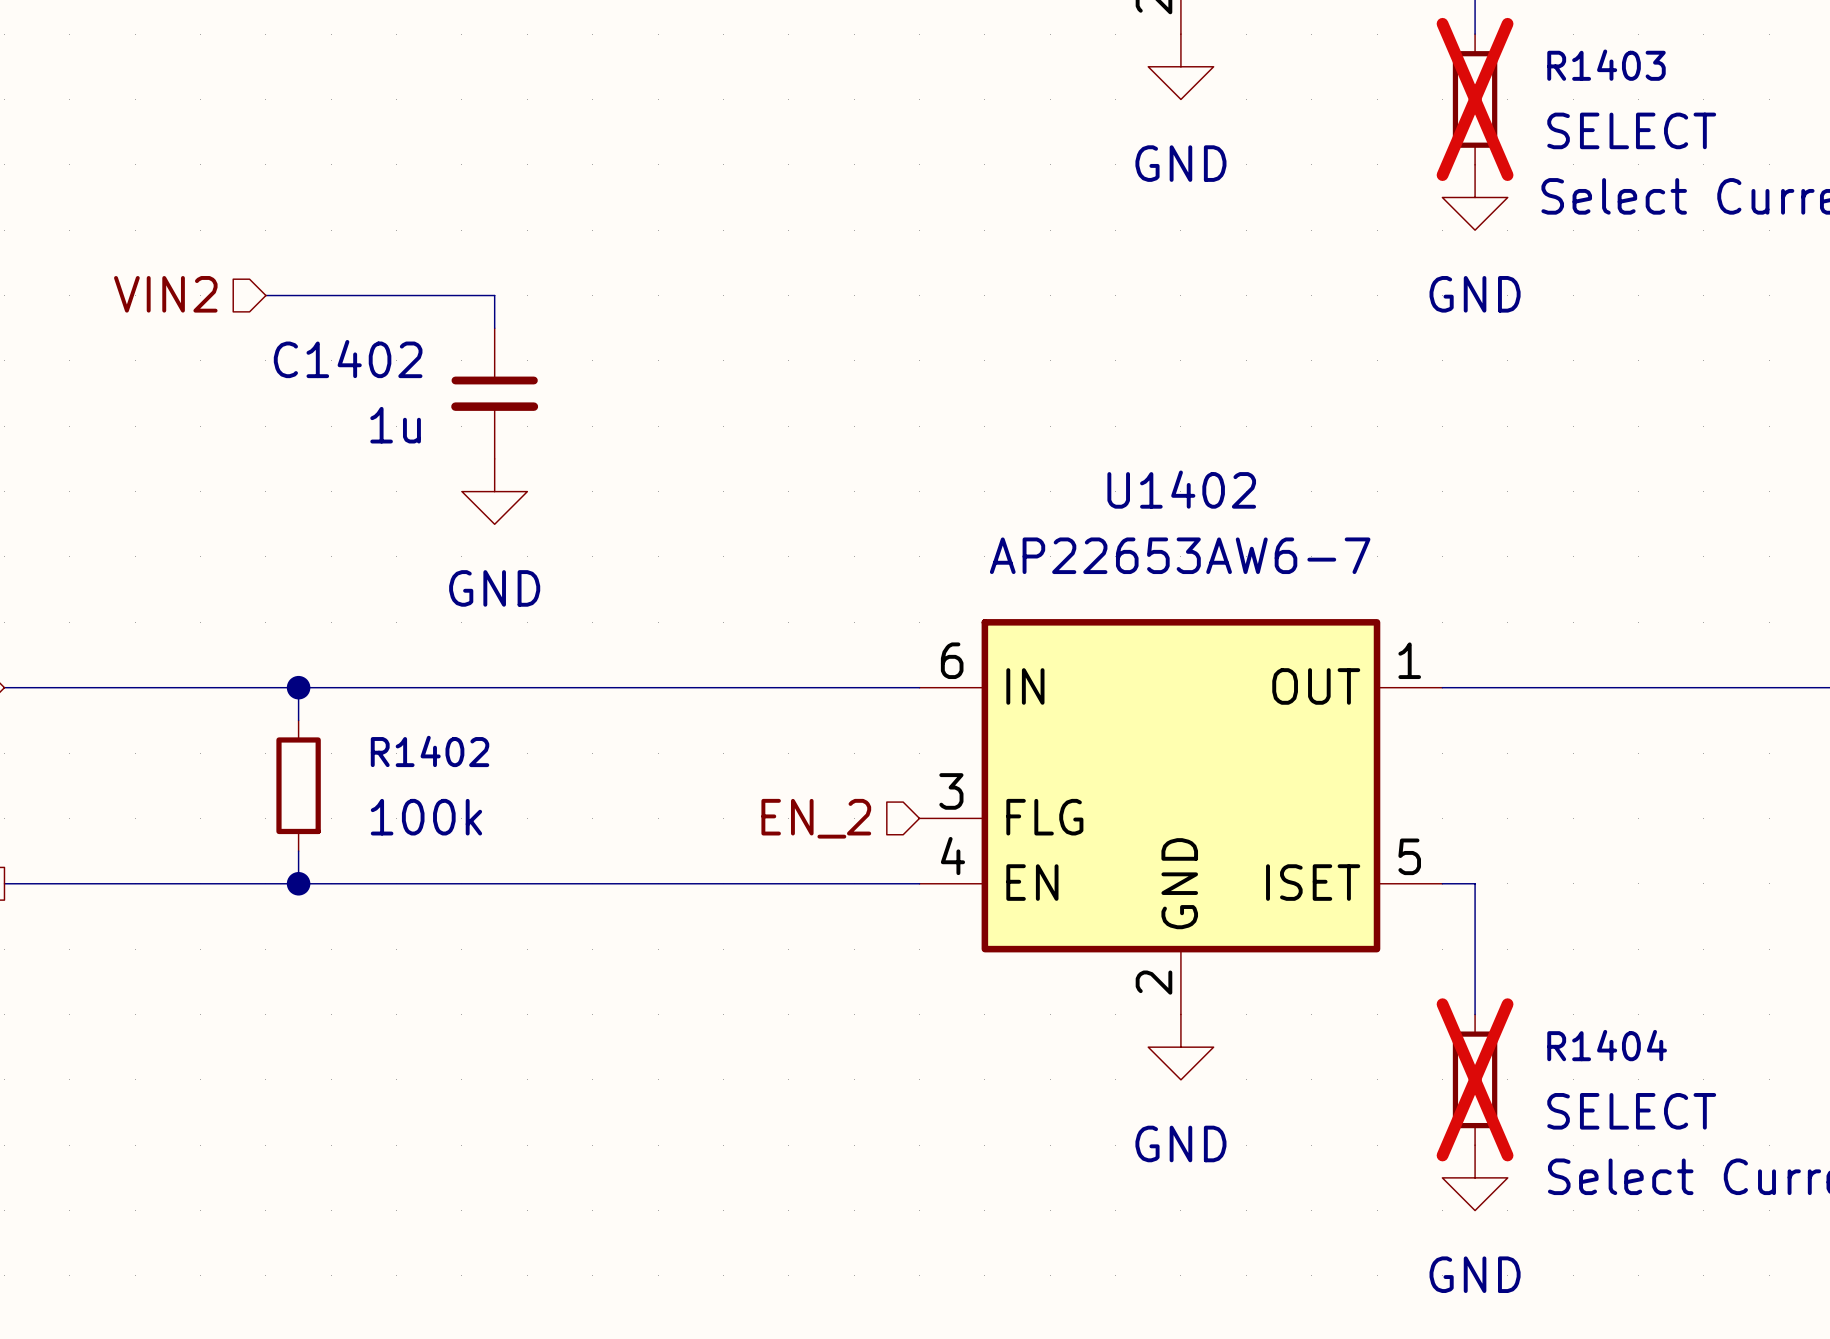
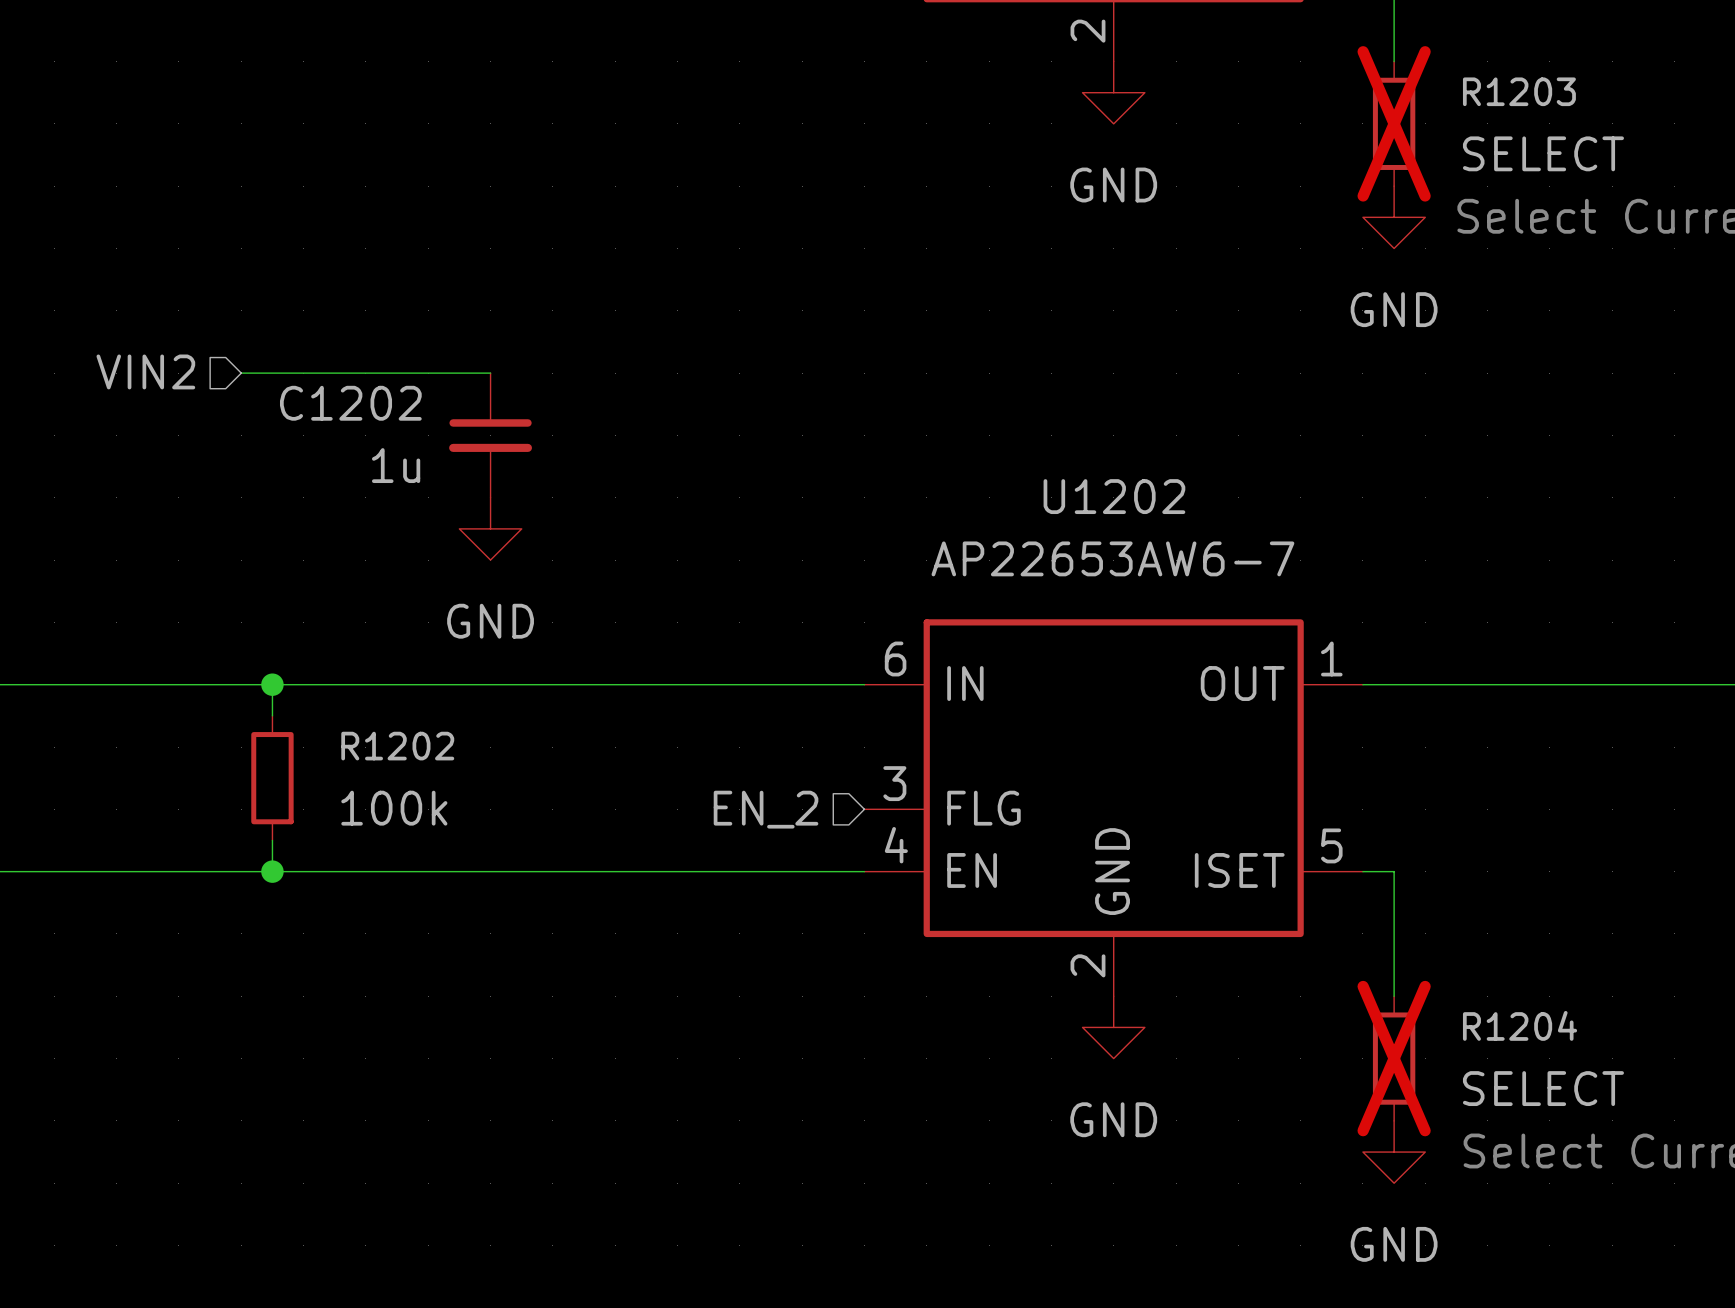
R1403 name: R1403 (1606, 65) -> R1203 (1519, 91)
hierarchical label position: VIN2 (165, 294) -> VIN2 (145, 371)
wire: (265, 295) (494, 295) (494, 328) -> none
wire: none -> (241, 373) (490, 373)
C1402: 1u (494, 393) -> none
C1202: none -> 1u (490, 435)
U1402 name: U1402 (1181, 489) -> U1202 (1114, 496)
power symbol position: GND (494, 491) -> GND (490, 528)
R1402 name: R1402 (430, 751) -> R1202 (397, 746)
R1404 name: R1404 (1607, 1045) -> R1204 (1520, 1025)

